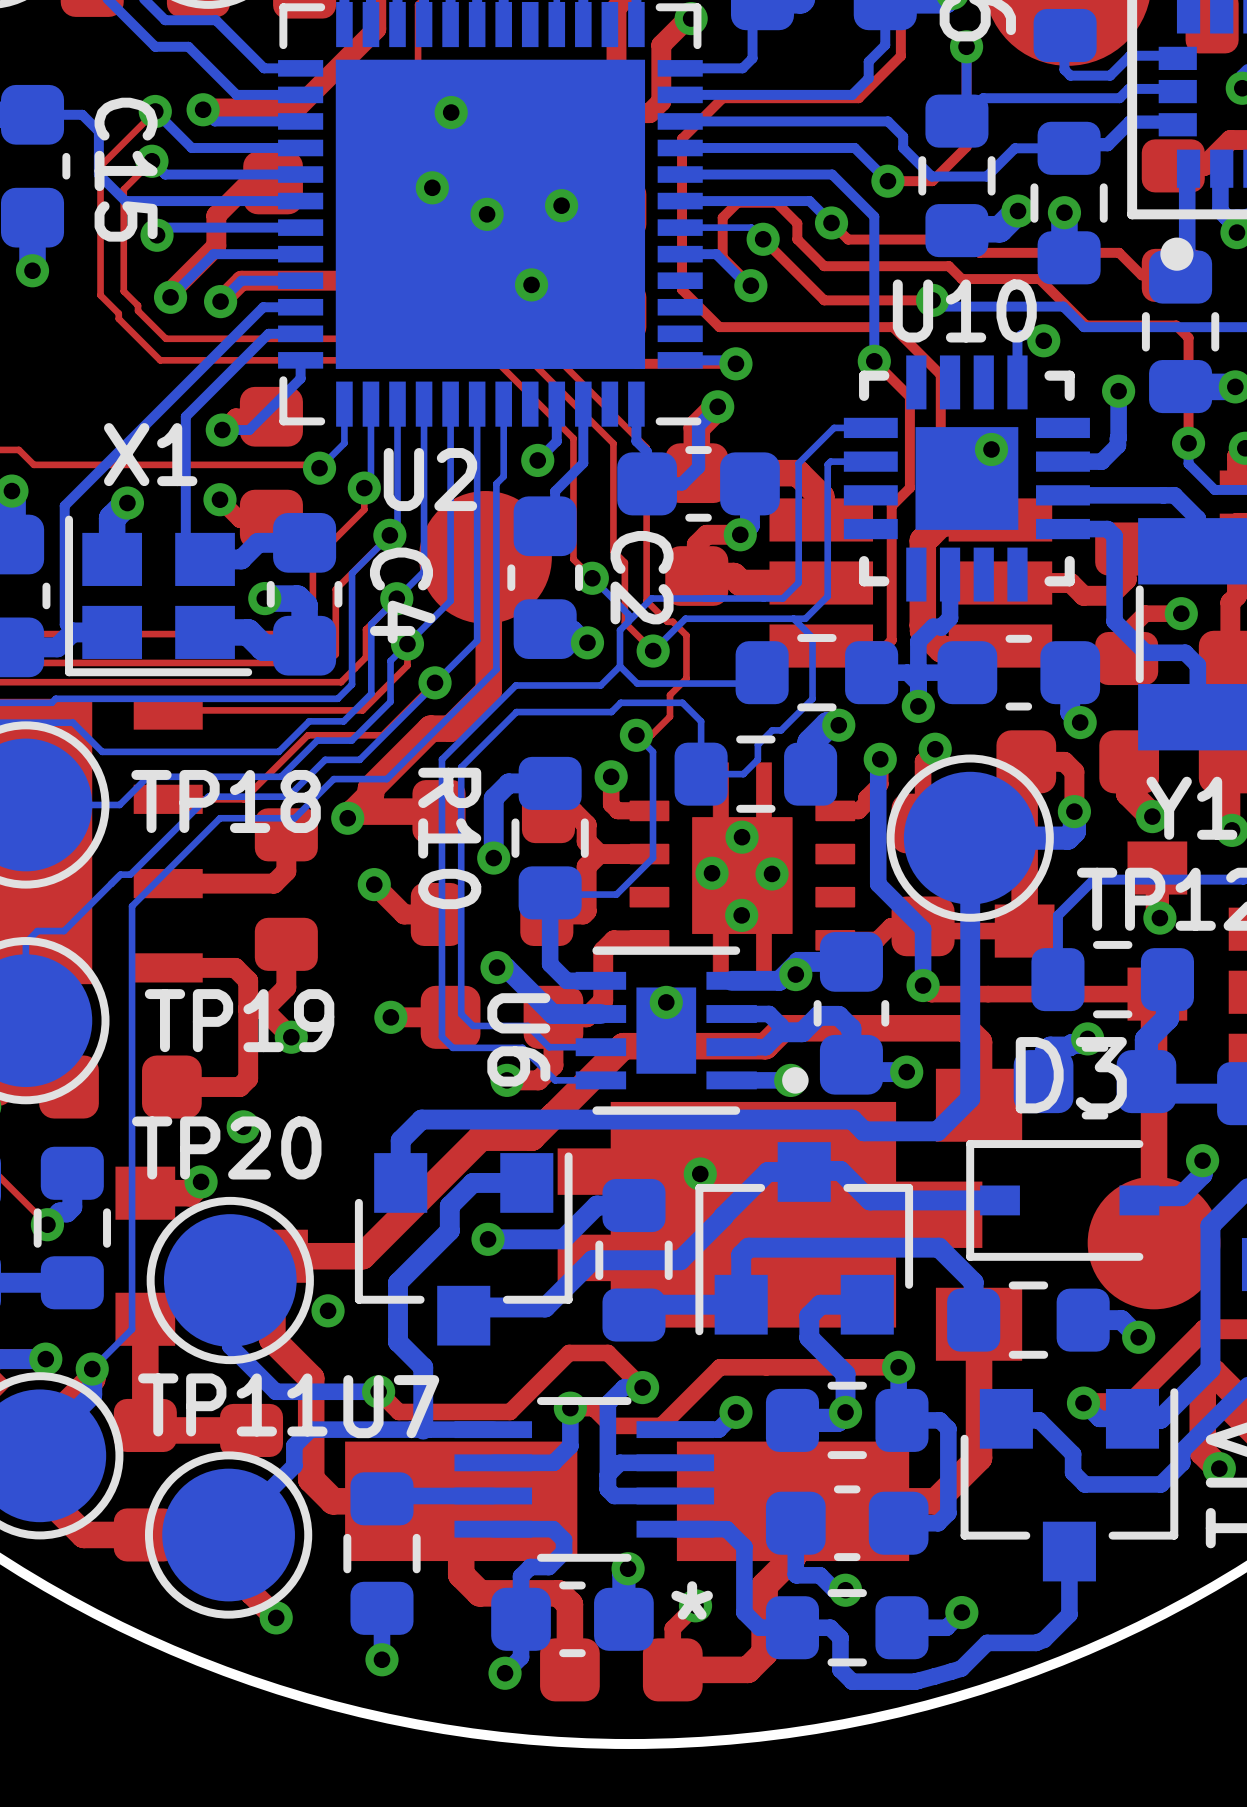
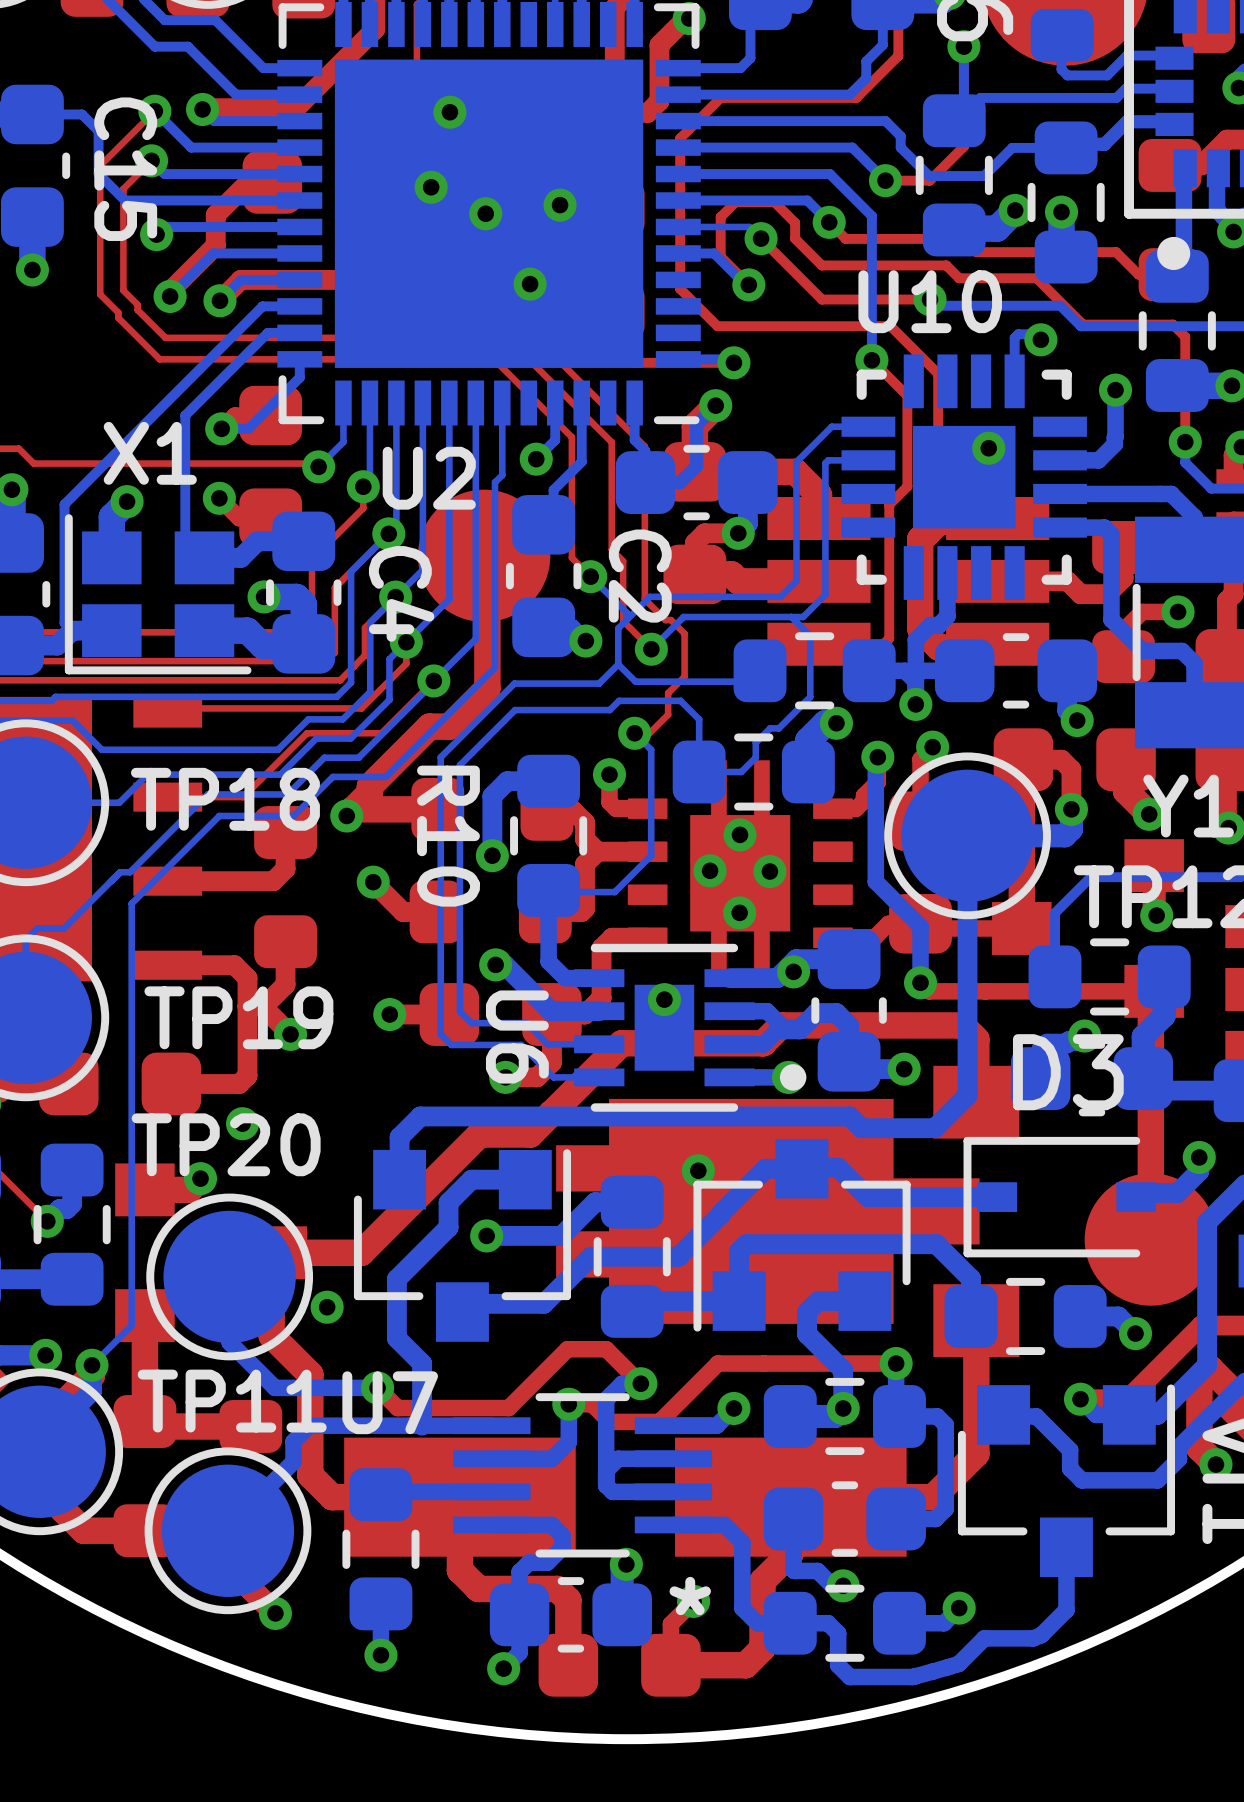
U10 name position: U10 (964, 310) -> U10 (930, 301)

